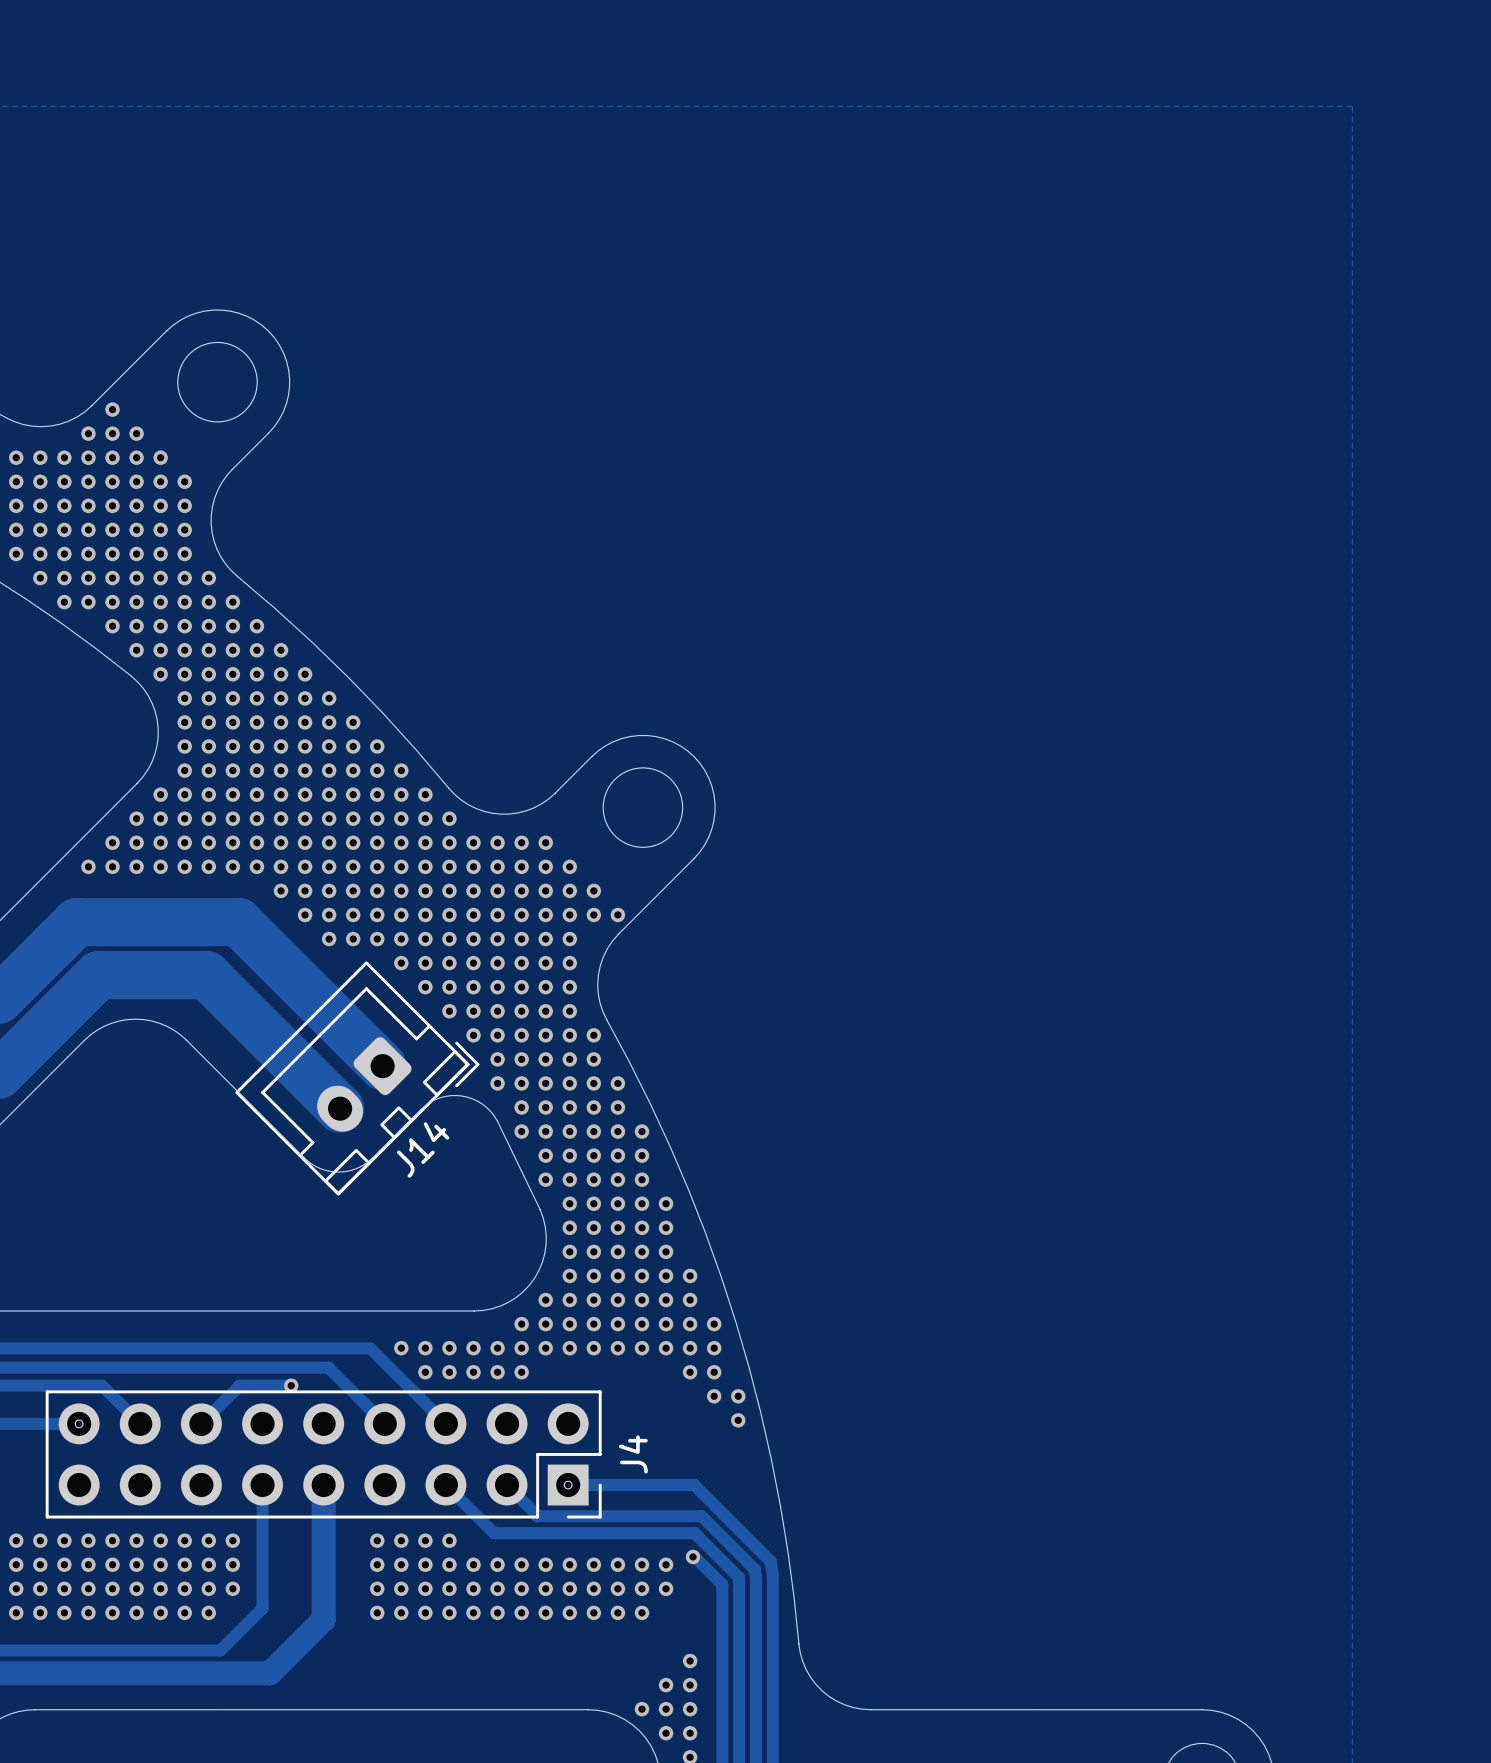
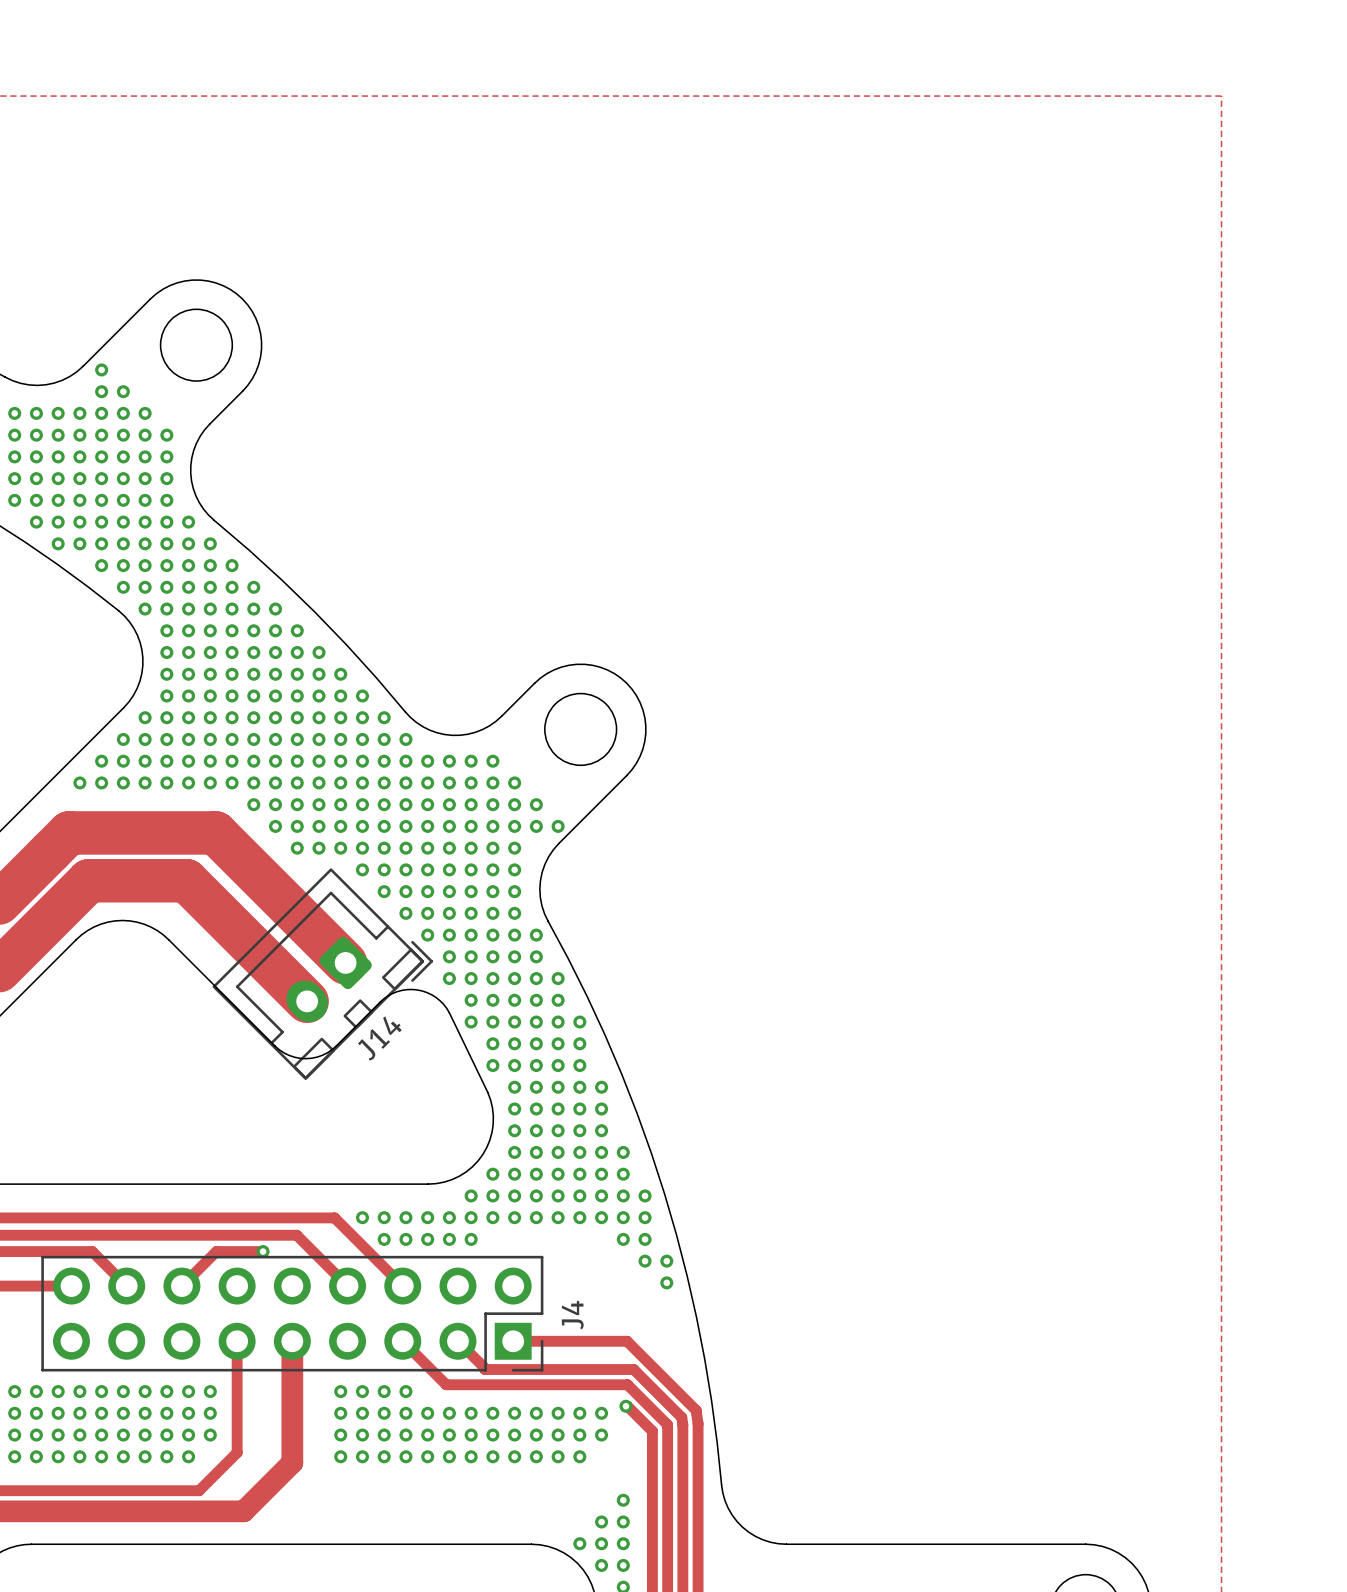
via: (88, 433) -> none
round board edge: [75, 1420, 84, 1428] -> none
round board edge: [564, 1481, 573, 1489] -> none

